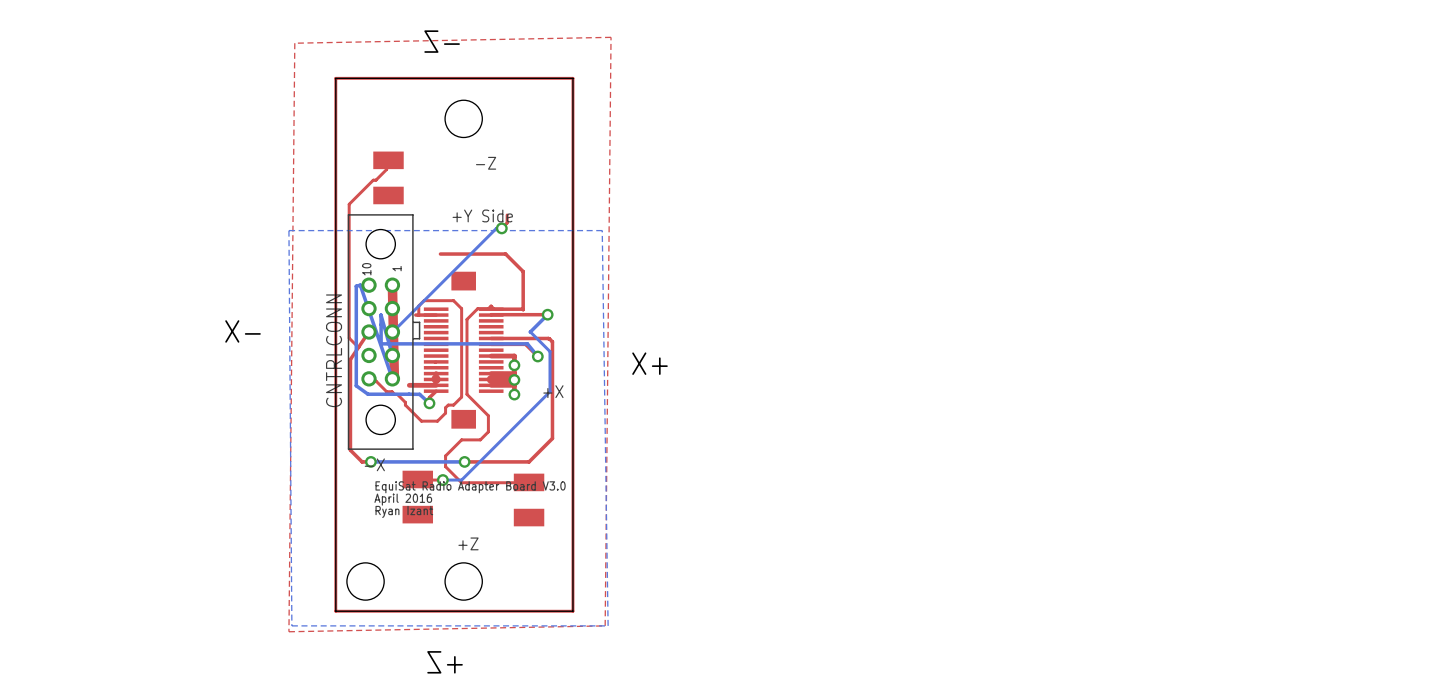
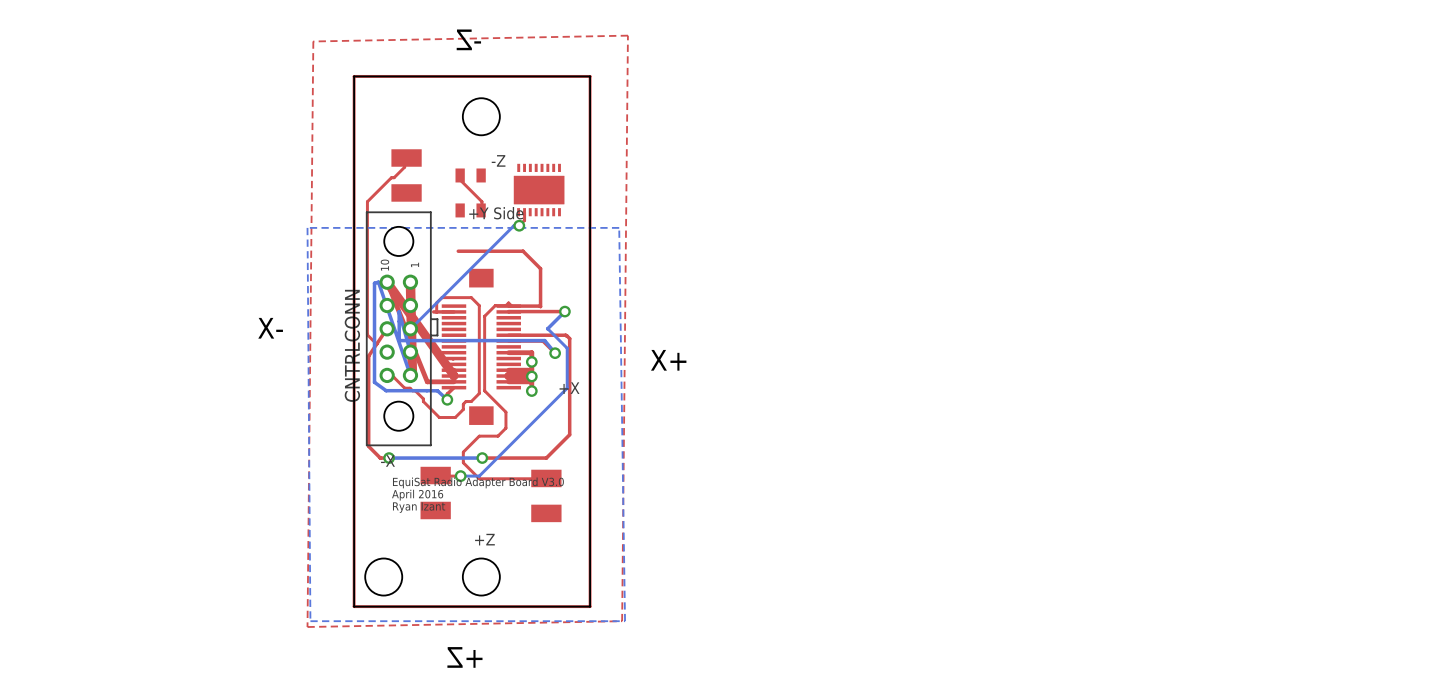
top track: none -> (460, 175) (458, 177) (481, 201) (481, 210)
part: none -> (470, 175)
part: none -> (539, 190)
part: none -> (470, 210)
top track: none -> (453, 375) (387, 282) (427, 381)

